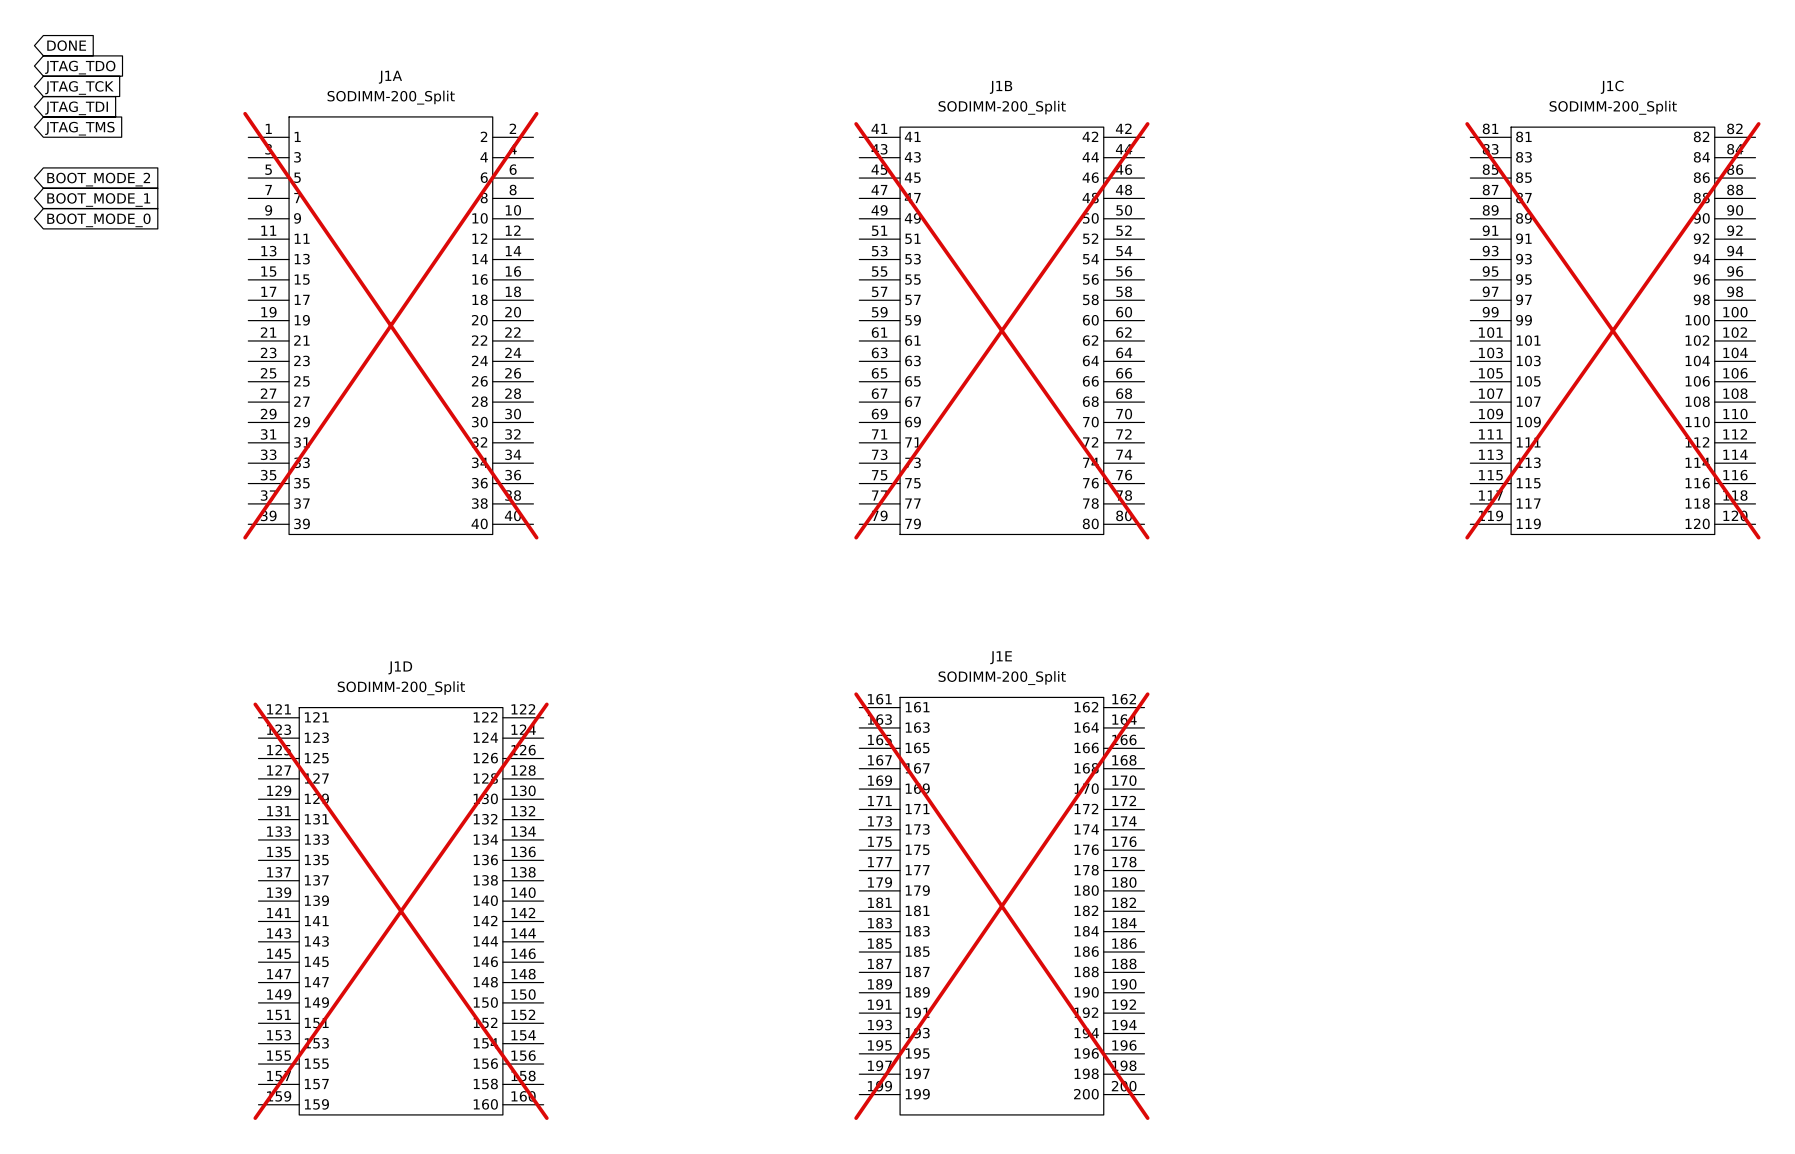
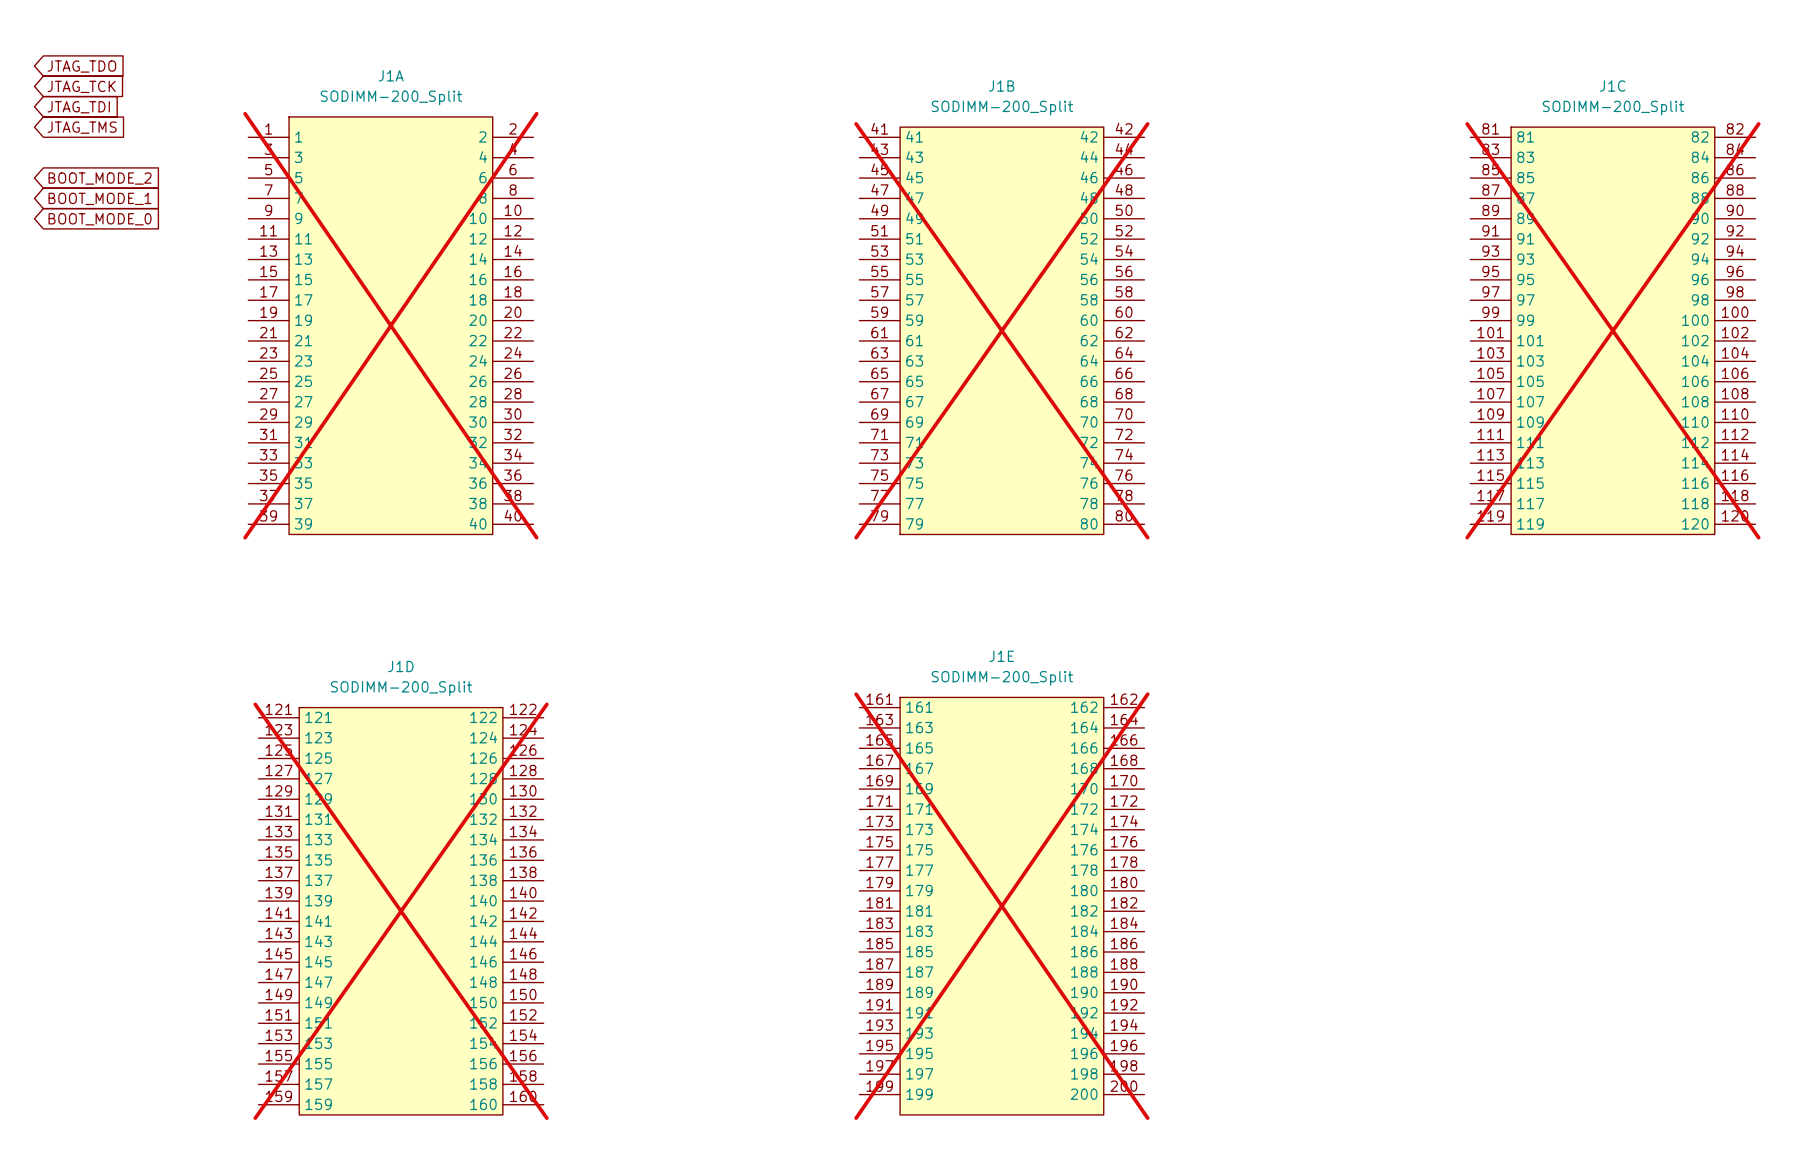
global label: DONE (66, 45) -> none

